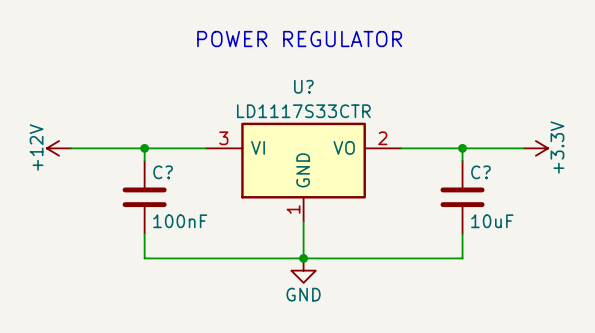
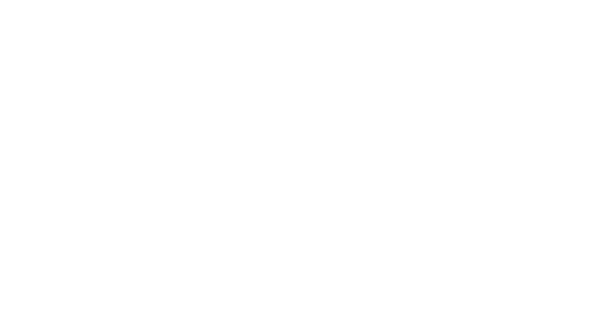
text: POWER REGULATOR (299, 39) -> none
power symbol: +12V (59, 148) -> none
wire: (71, 148) (205, 148) -> none
wire: (144, 148) (144, 160) -> none
junction: (144, 148) -> none
wire: (401, 148) (523, 148) -> none
wire: (462, 148) (462, 160) -> none
junction: (462, 148) -> none
power symbol: +3.3V (535, 148) -> none
U?: LD1117S33CTR (303, 172) -> none
C?: 100nF (144, 197) -> none
C?: 10uF (462, 197) -> none
wire: (303, 221) (303, 258) -> none
wire: (144, 233) (144, 258) (462, 258) (462, 233) -> none
junction: (303, 258) -> none
power symbol: GND (303, 270) -> none

